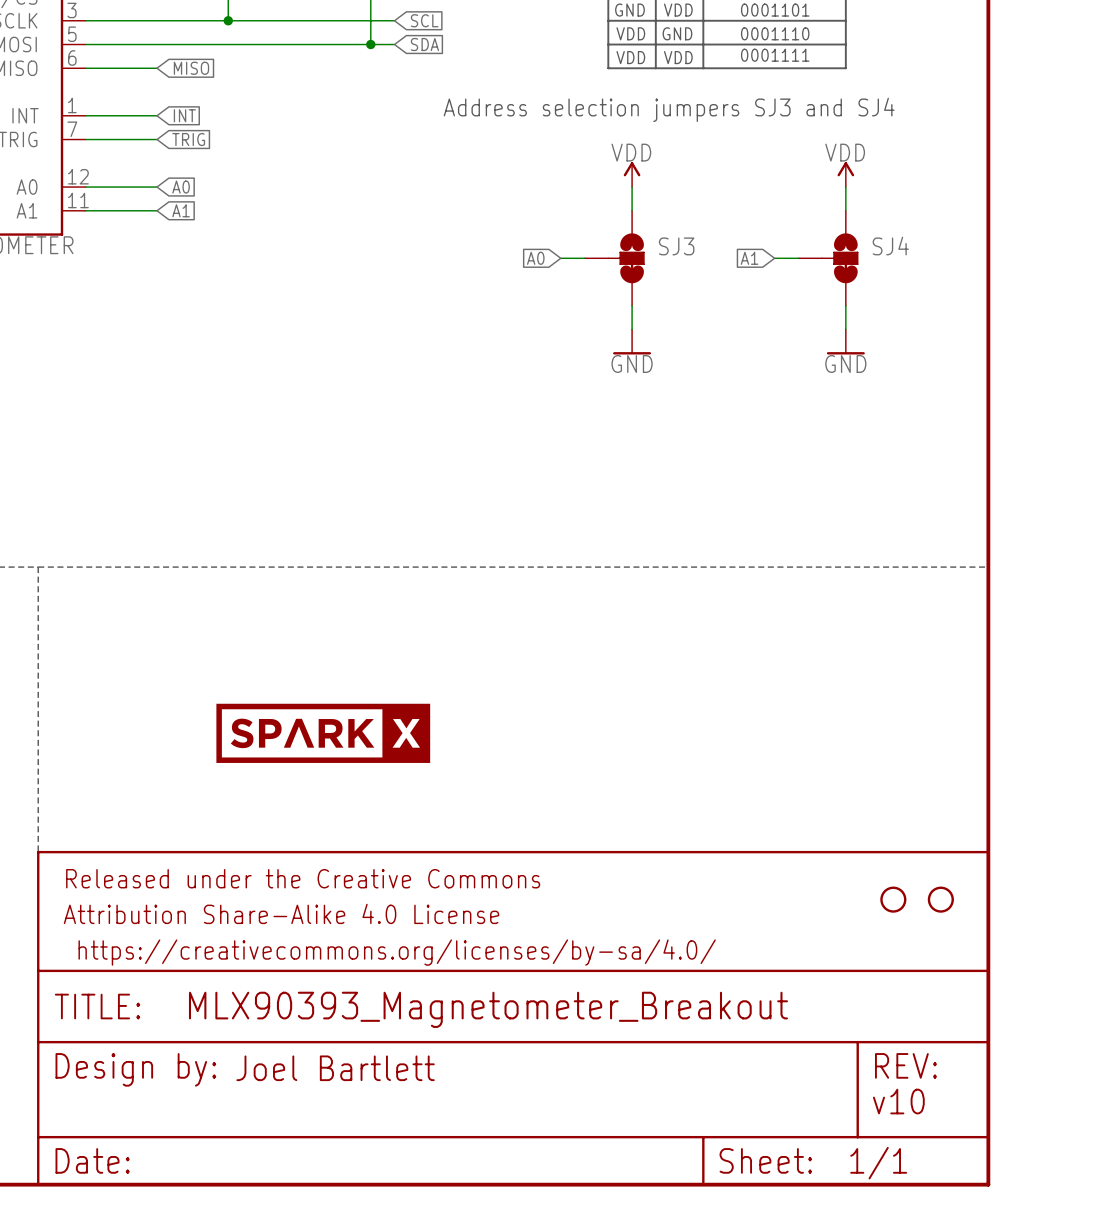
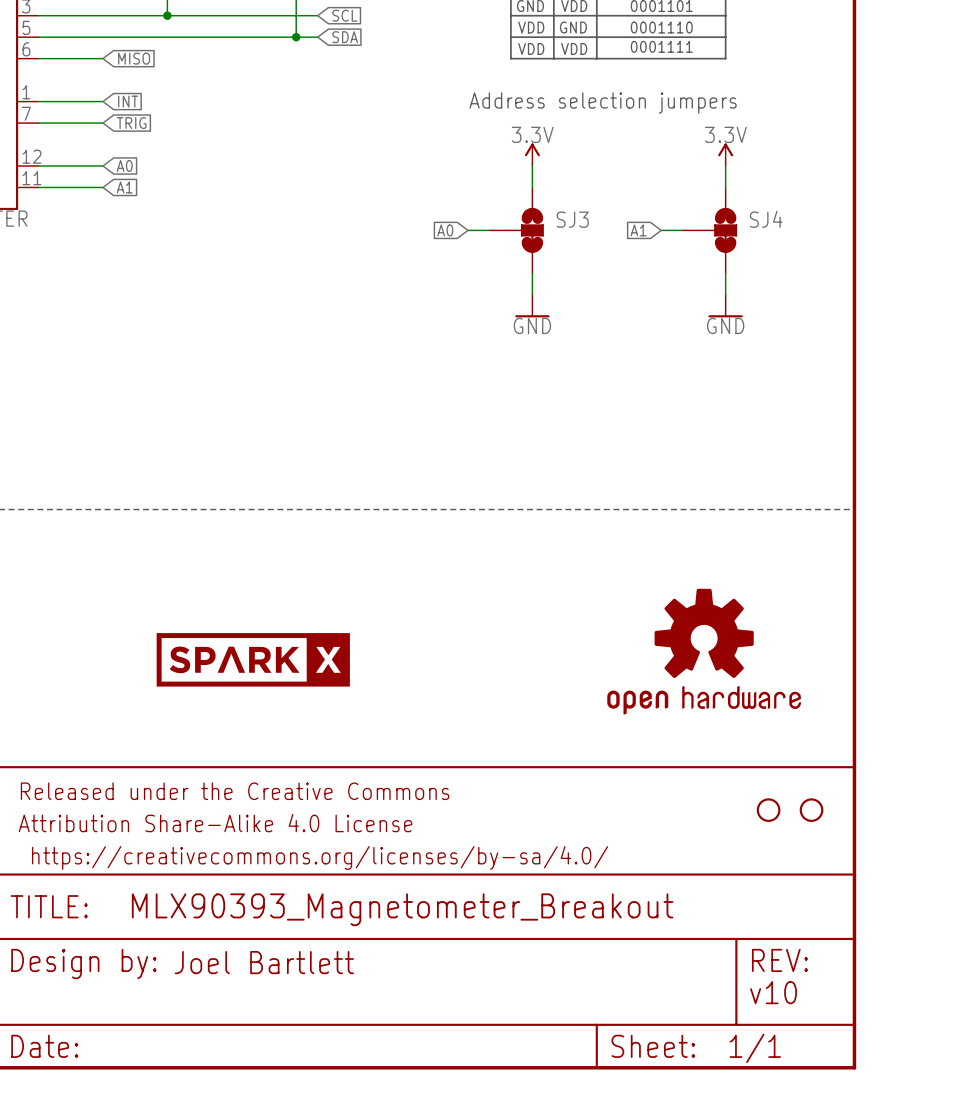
text: Address selection jumpers SJ3 and SJ4 (669, 109) -> Address selection jumpers (603, 103)
power symbol: VDD (632, 174) -> 3.3V (532, 154)
power symbol: VDD (845, 174) -> 3.3V (725, 154)
part: none -> (704, 651)

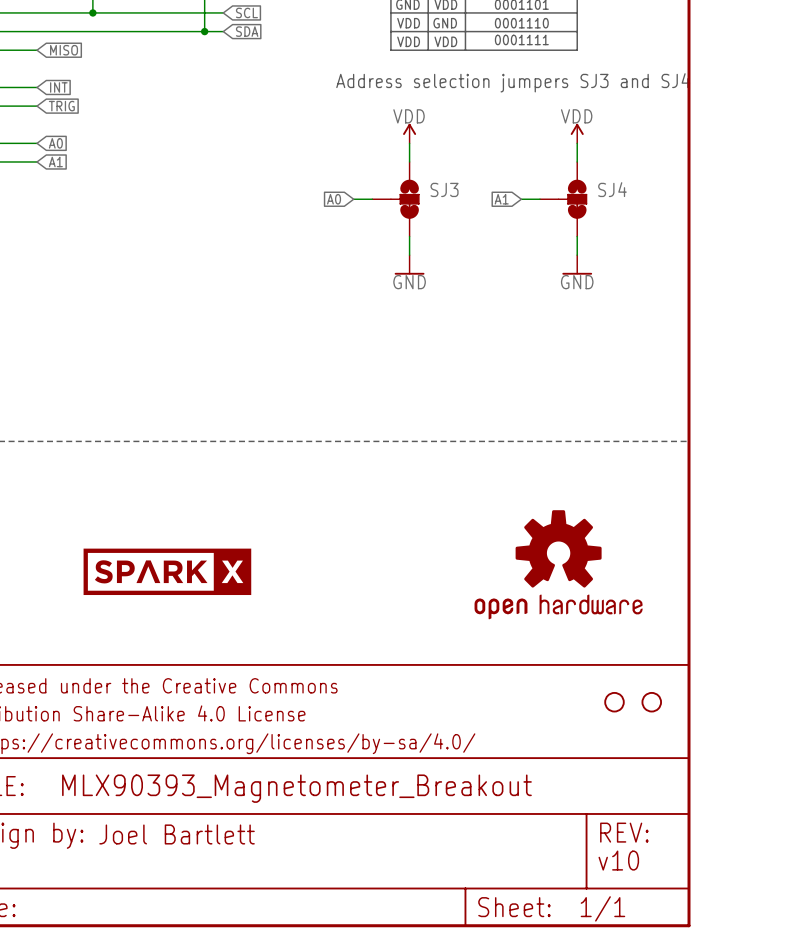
text: Address selection jumpers (603, 103) -> Address selection jumpers SJ3 and SJ4 (513, 82)
power symbol: 3.3V (532, 154) -> VDD (409, 133)
power symbol: 3.3V (725, 154) -> VDD (577, 133)

